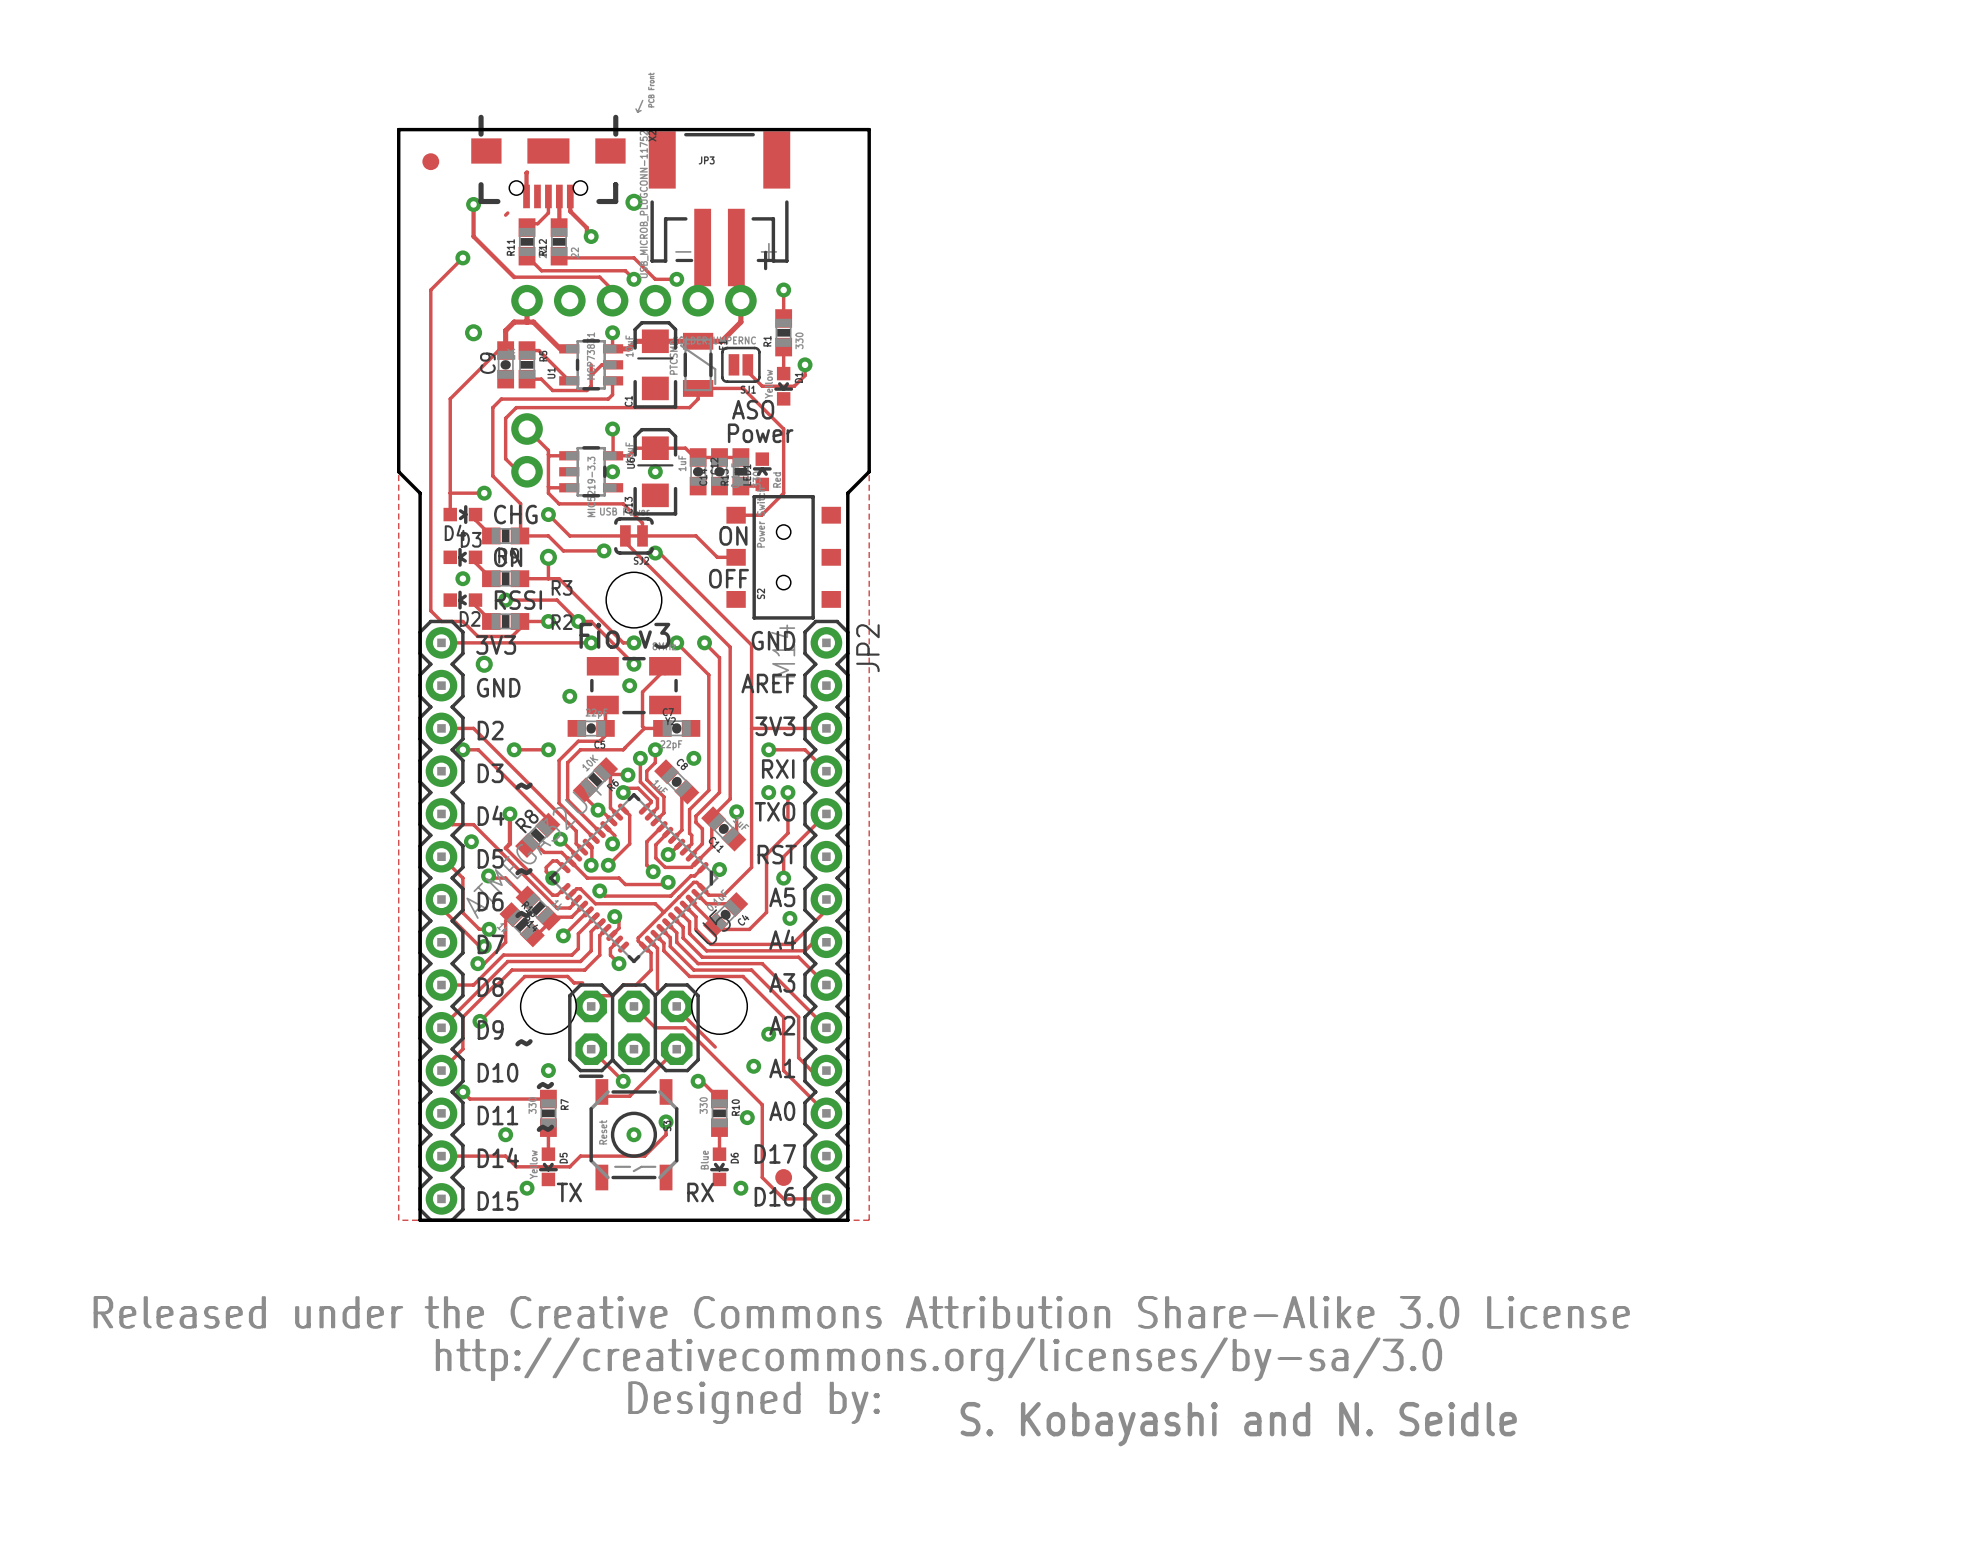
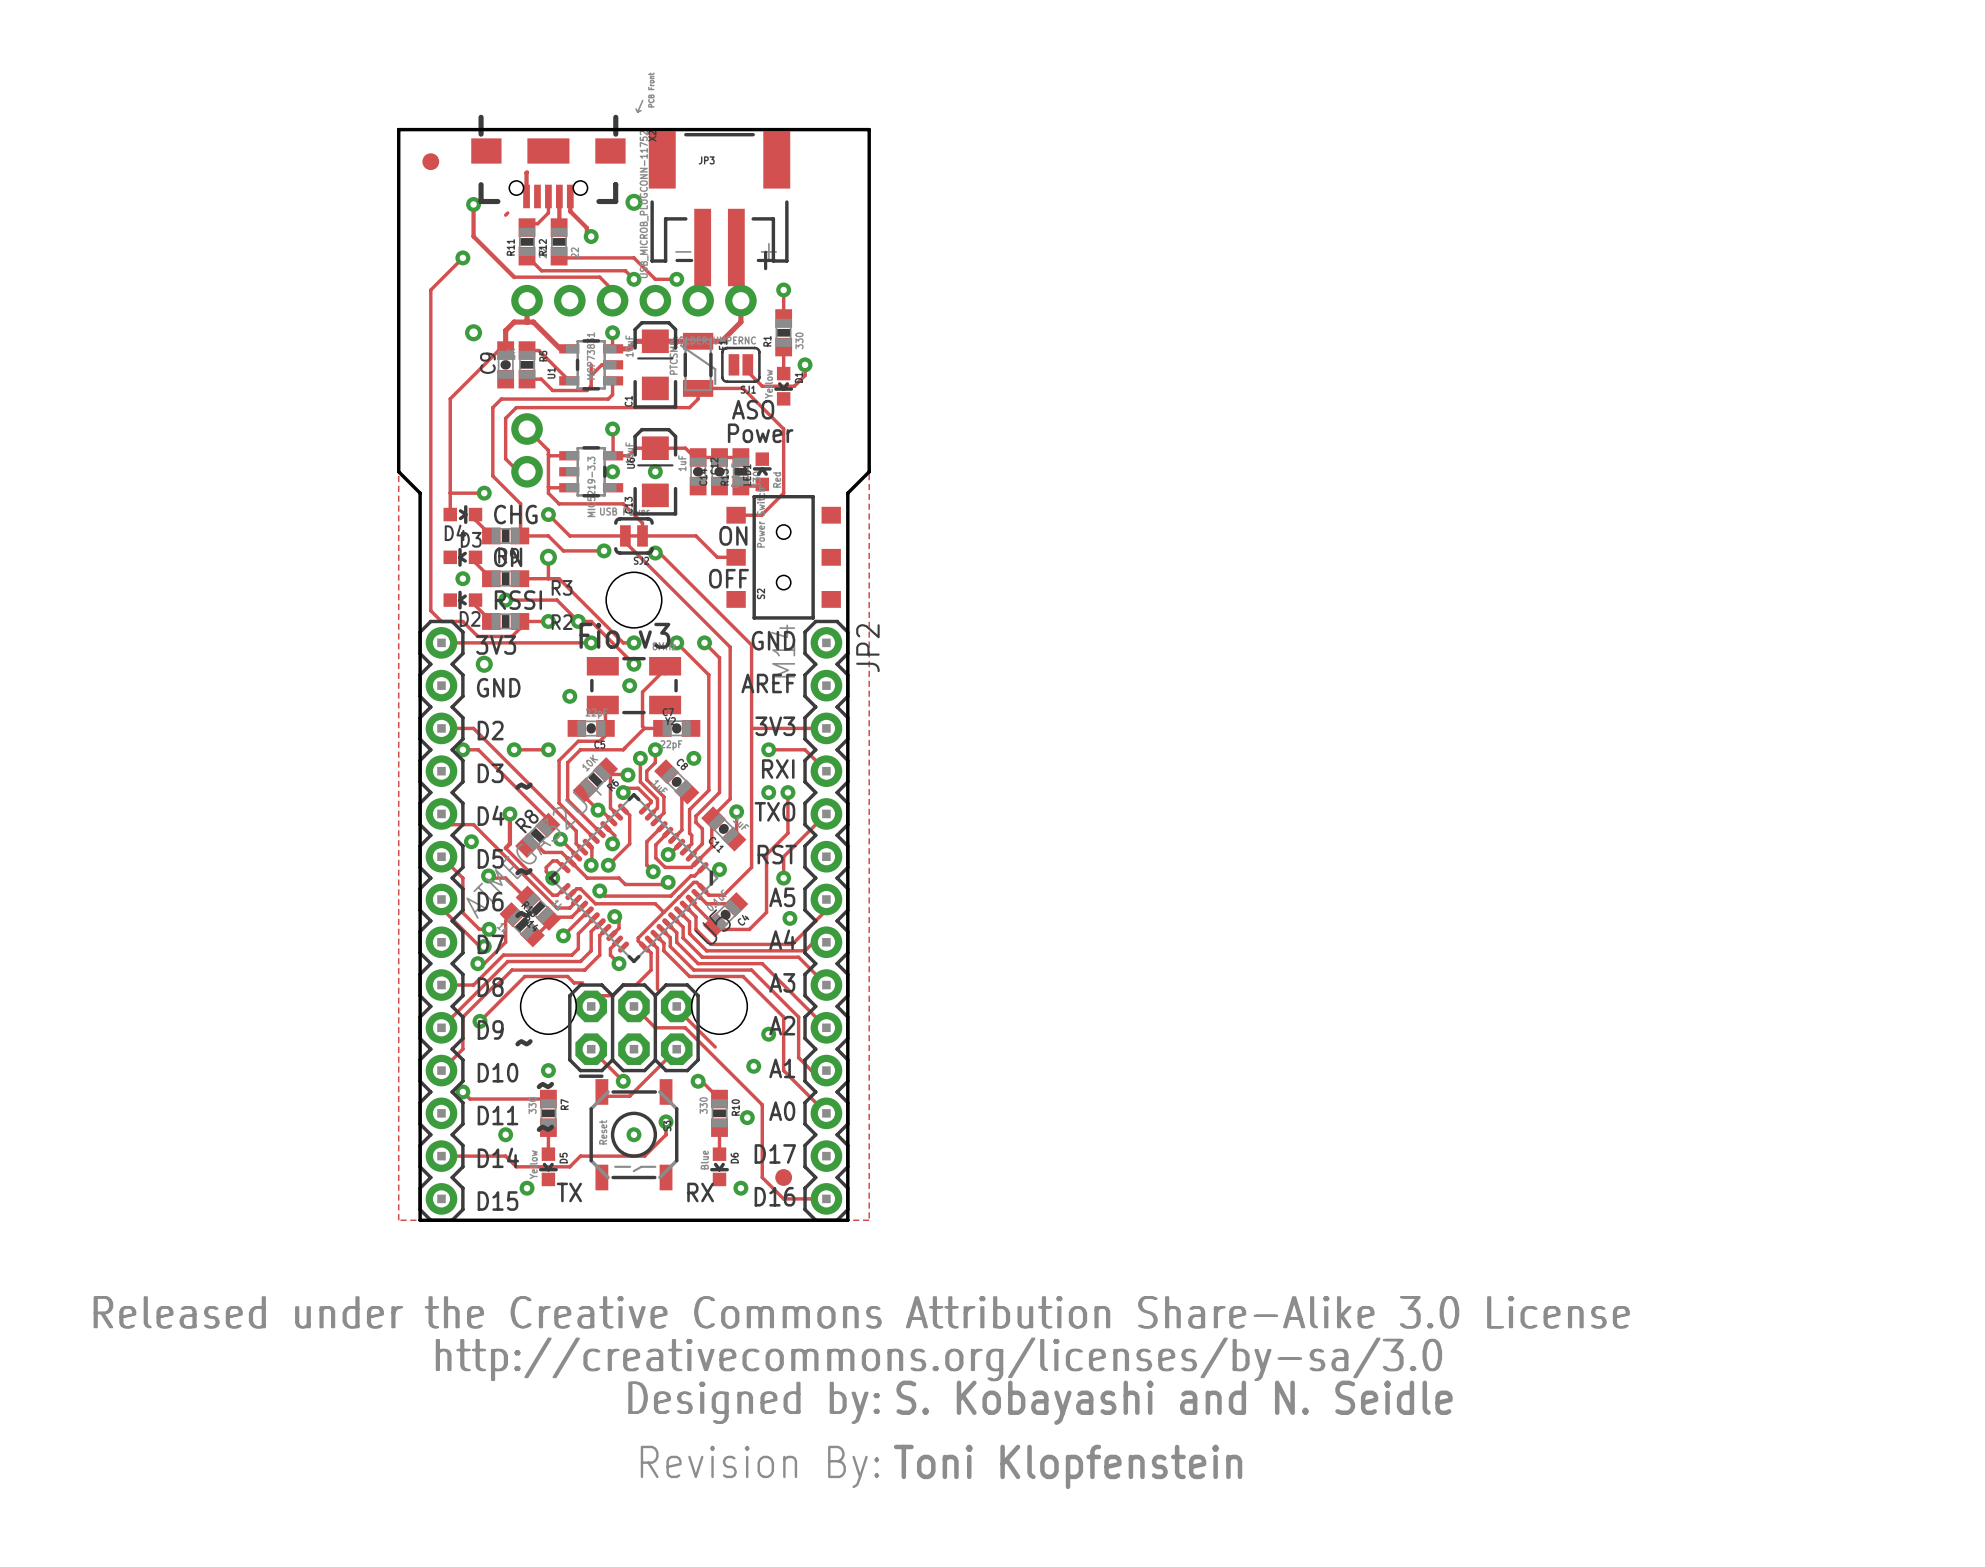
text position: S. Kobayashi and N. Seidle (1238, 1424) -> S. Kobayashi and N. Seidle (1174, 1402)
drawing: none -> [640, 1445, 880, 1489]
text: none -> Toni Klopfenstein (1068, 1466)

